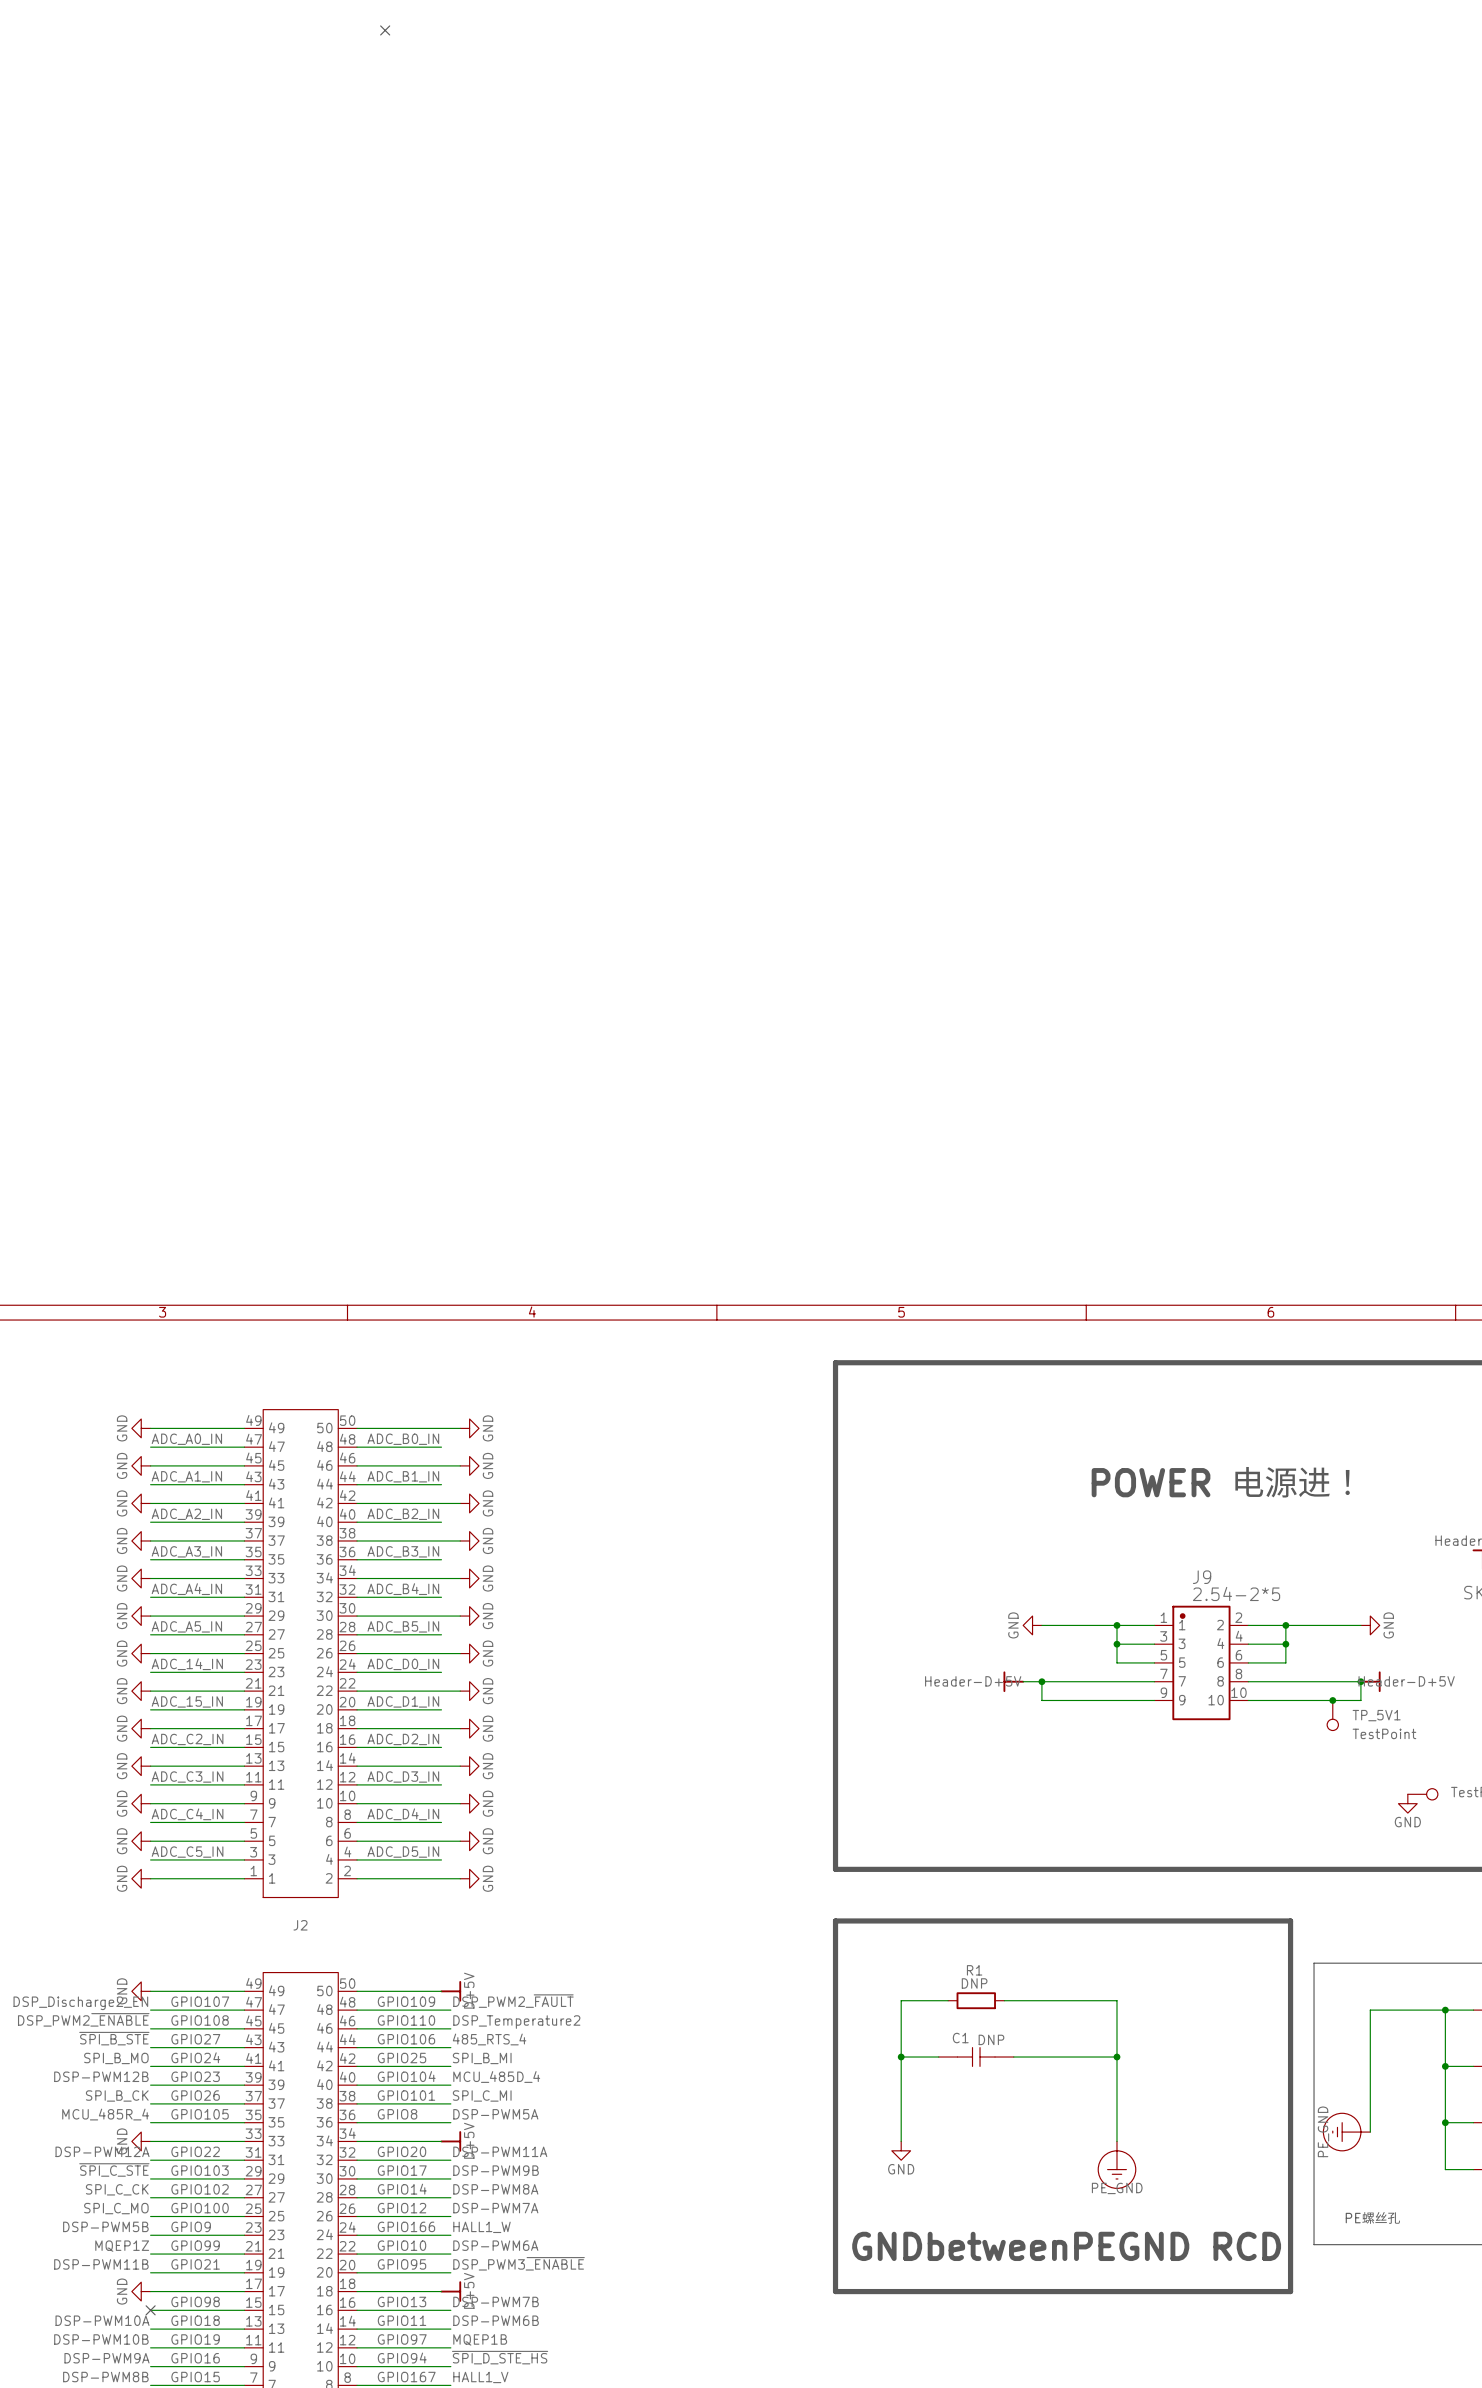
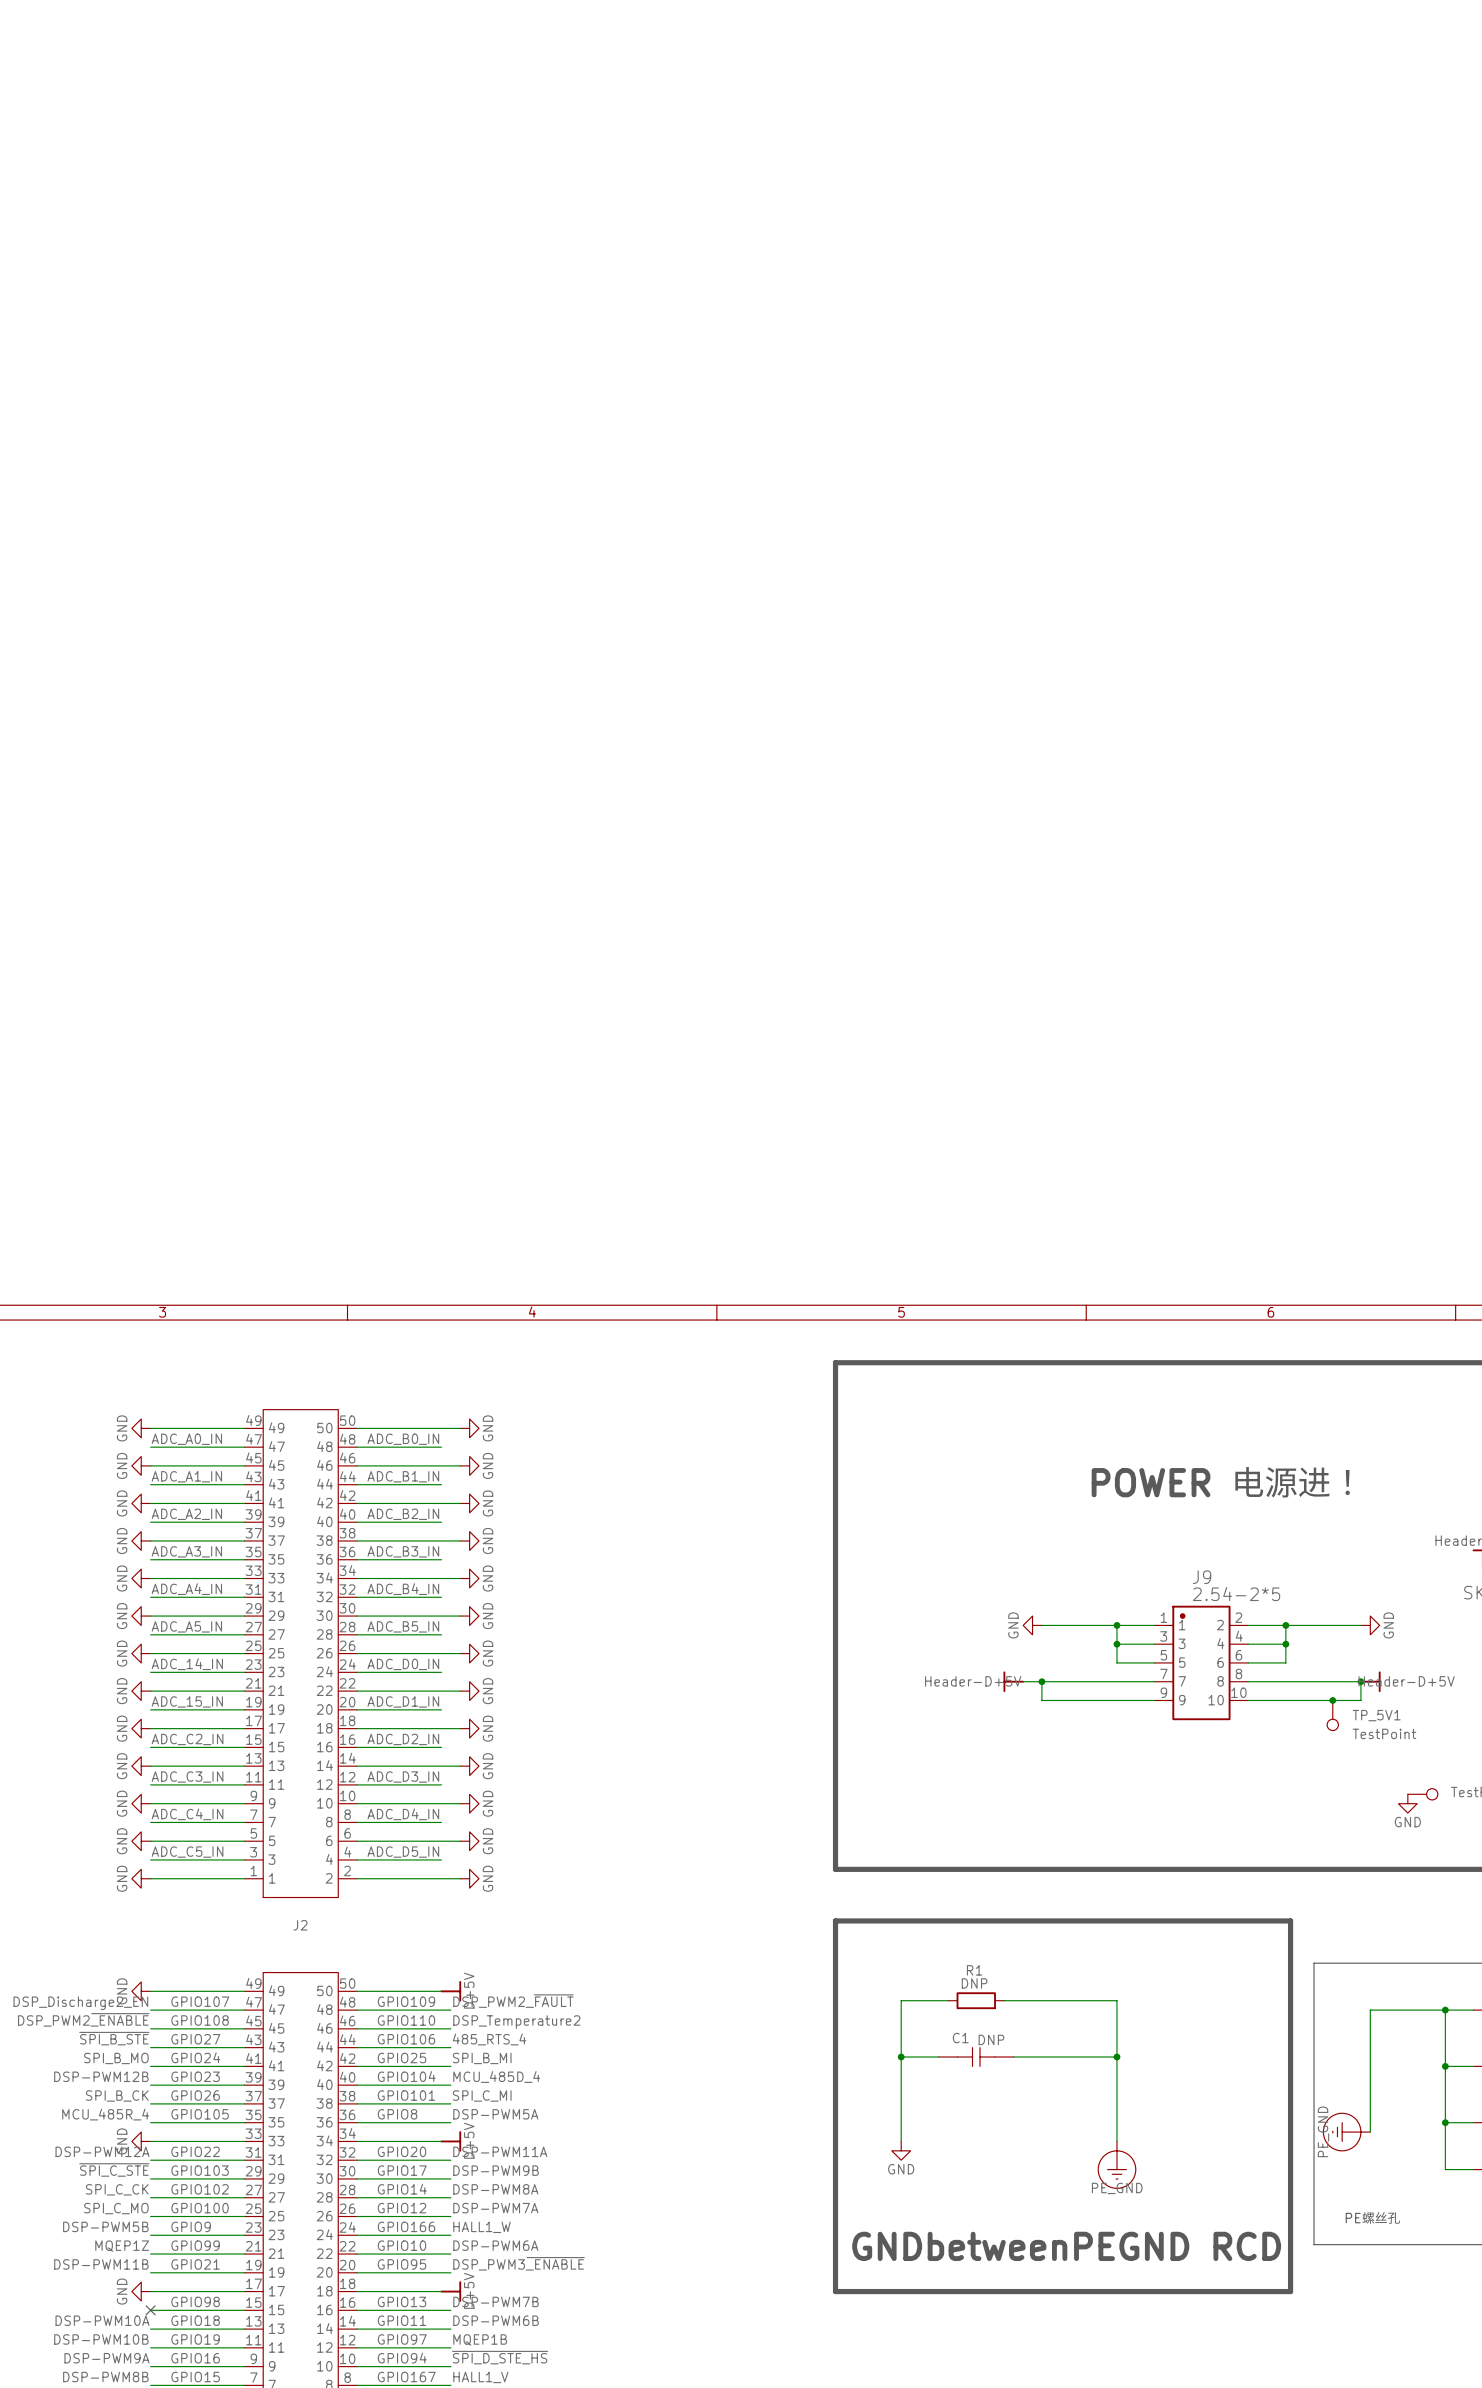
no-connect mark: (385, 30) -> none

